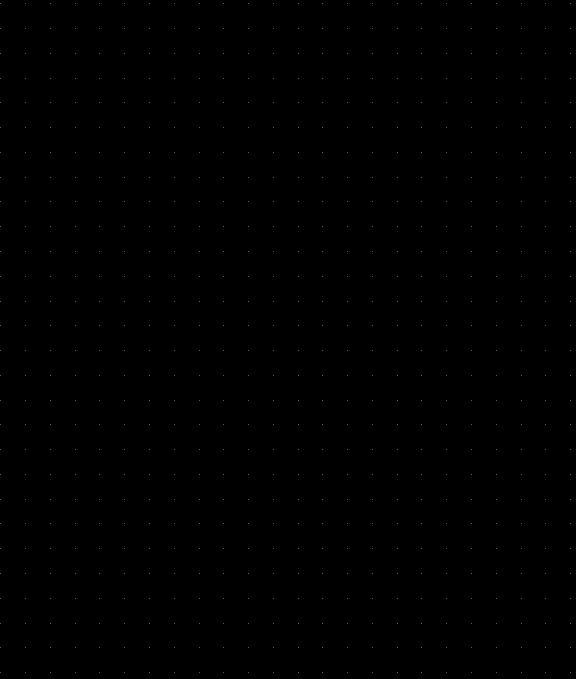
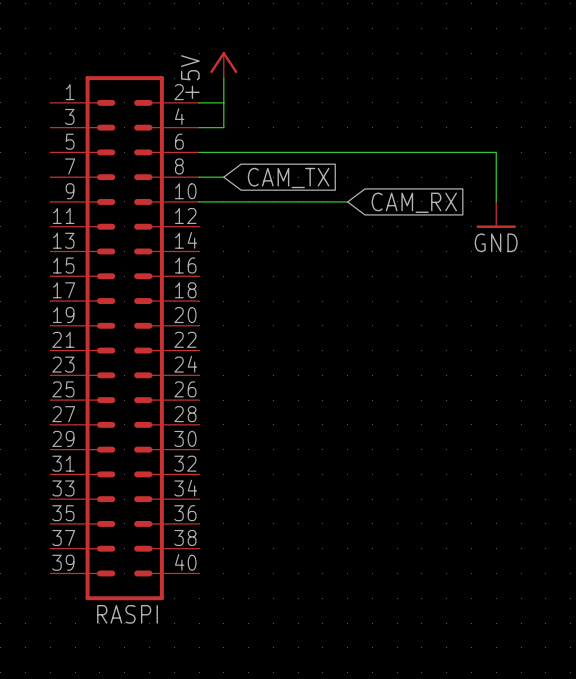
power symbol: none -> +5V (223, 65)
wire: none -> (223, 78) (223, 127) (199, 127)
wire: none -> (199, 102) (223, 102)
wire: none -> (199, 152) (496, 152) (496, 201)
wire: none -> (199, 177) (223, 177)
global label: none -> CAM_TX (288, 178)
wire: none -> (199, 201) (347, 201)
global label: none -> CAM_RX (414, 202)
power symbol: none -> GND (496, 214)
RASPI: none -> (124, 338)

